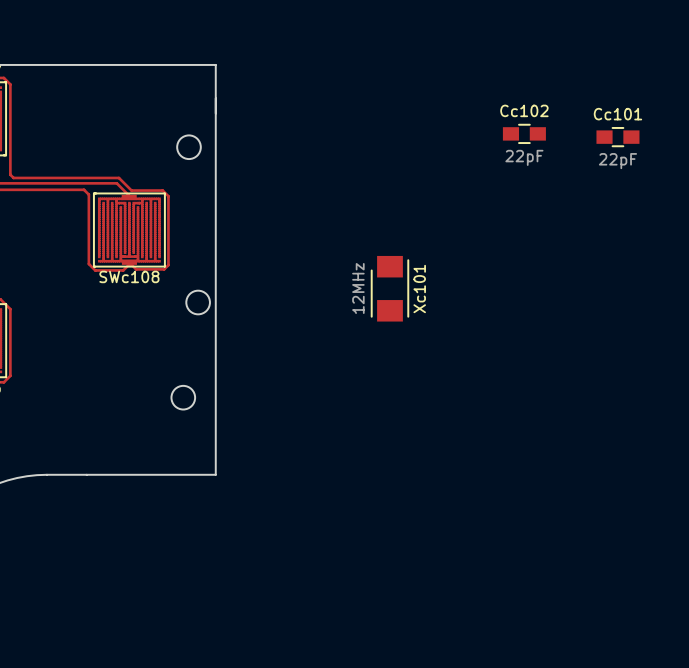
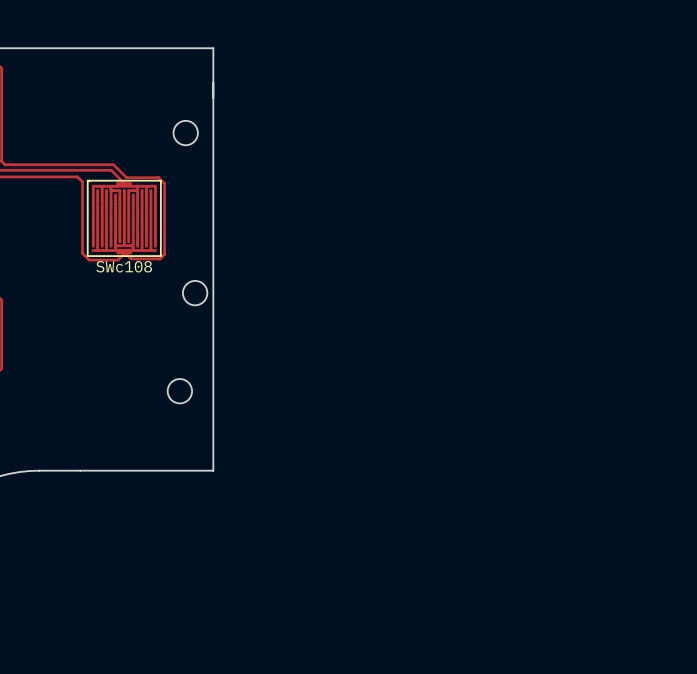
Cc102: 22pF (524, 133) -> none
Cc101: 22pF (617, 137) -> none
Xc101: 12MHz (389, 288) -> none

